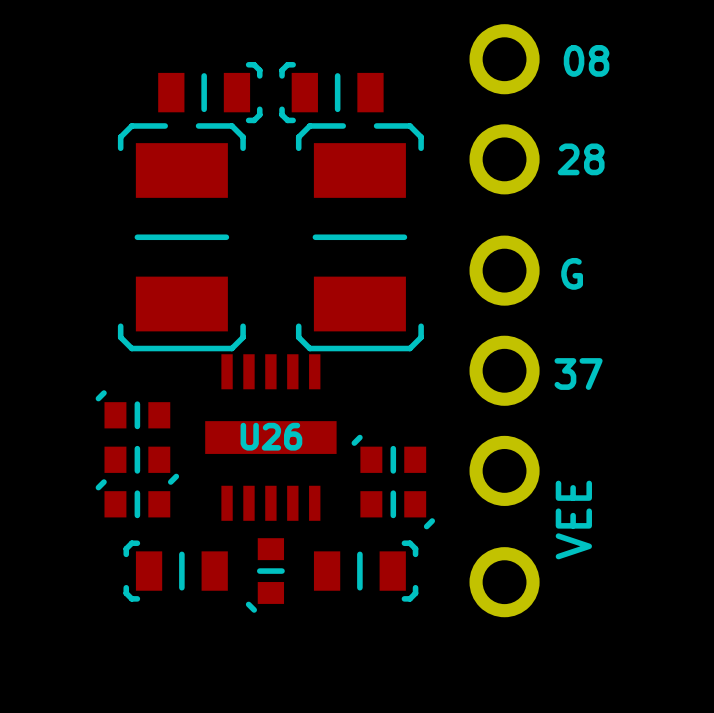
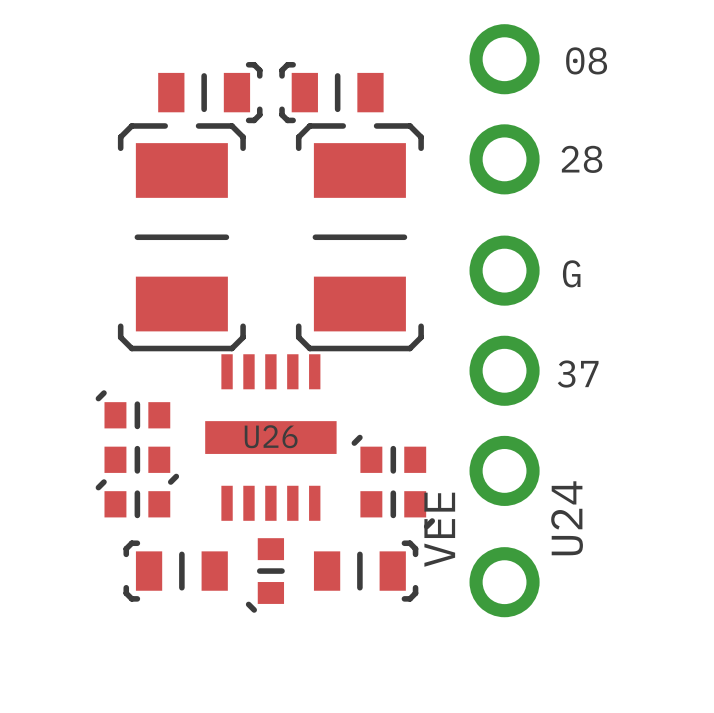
U24 name: none -> U24 (567, 518)
U24 value position: VEE (573, 520) -> VEE (439, 529)

